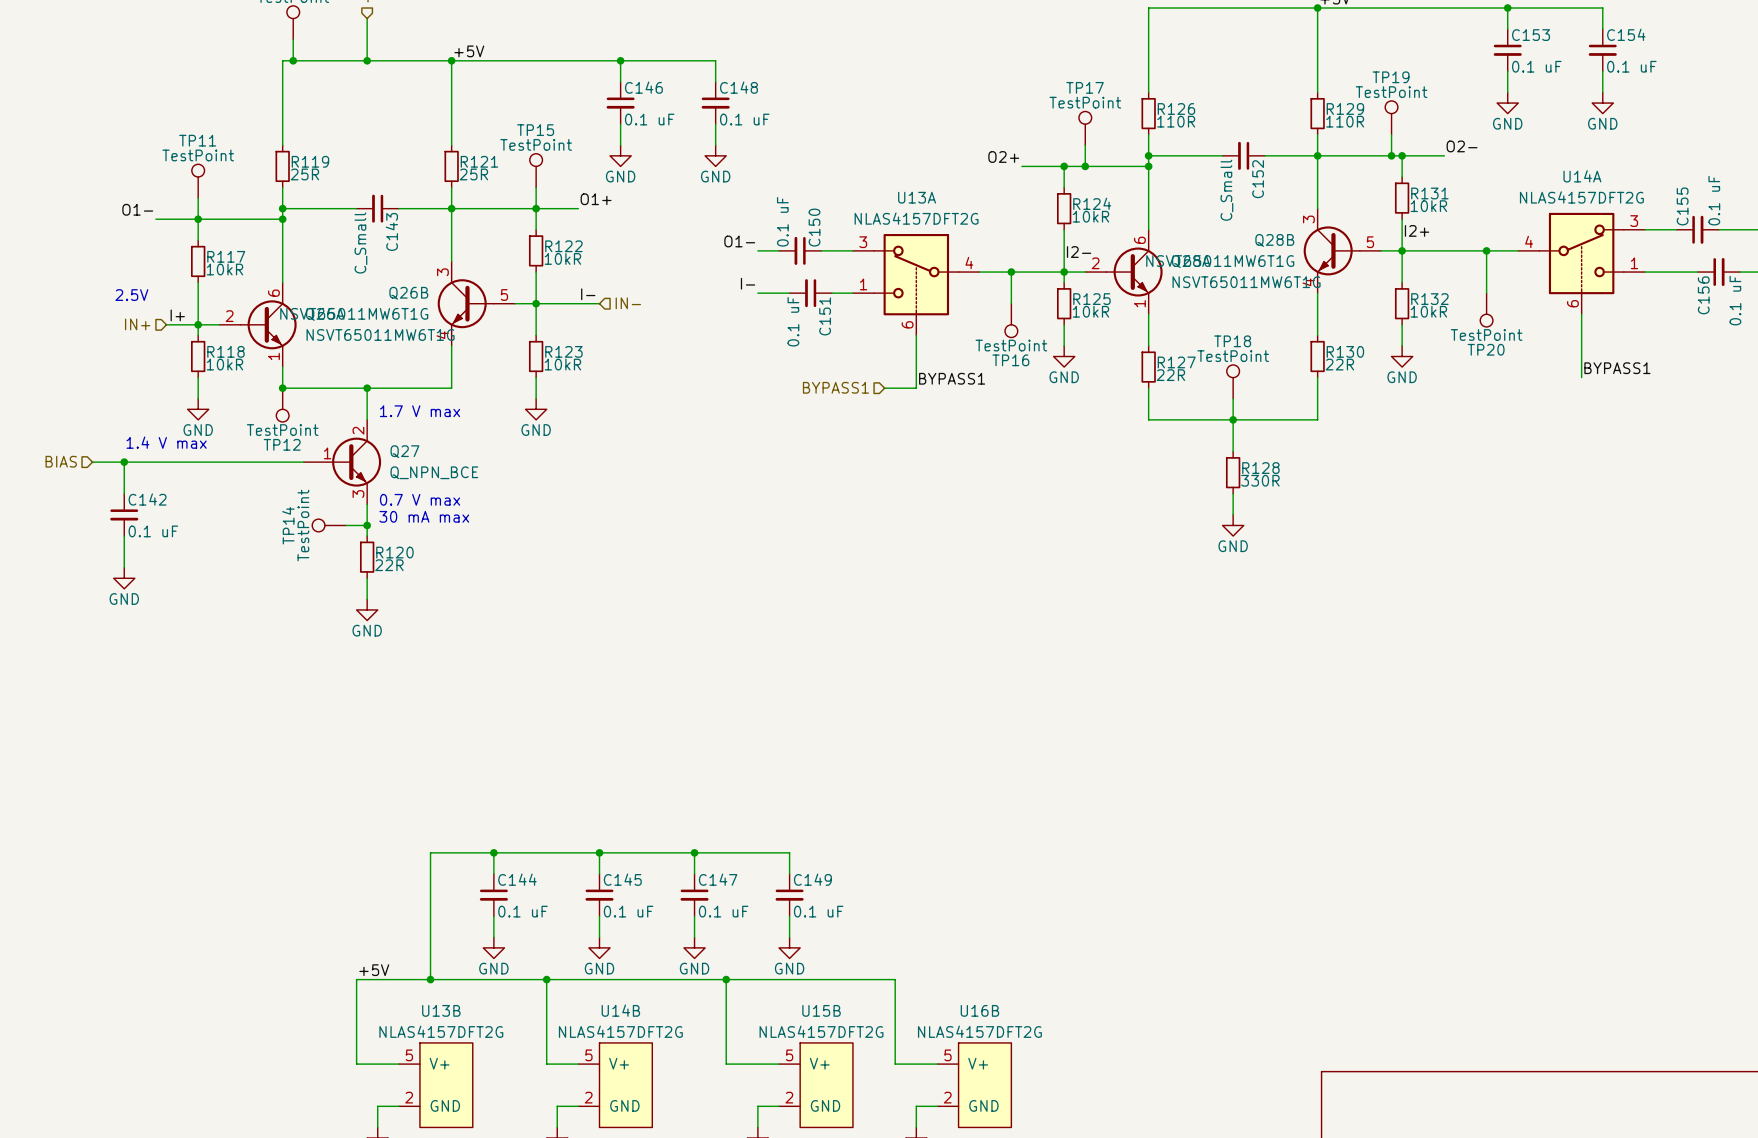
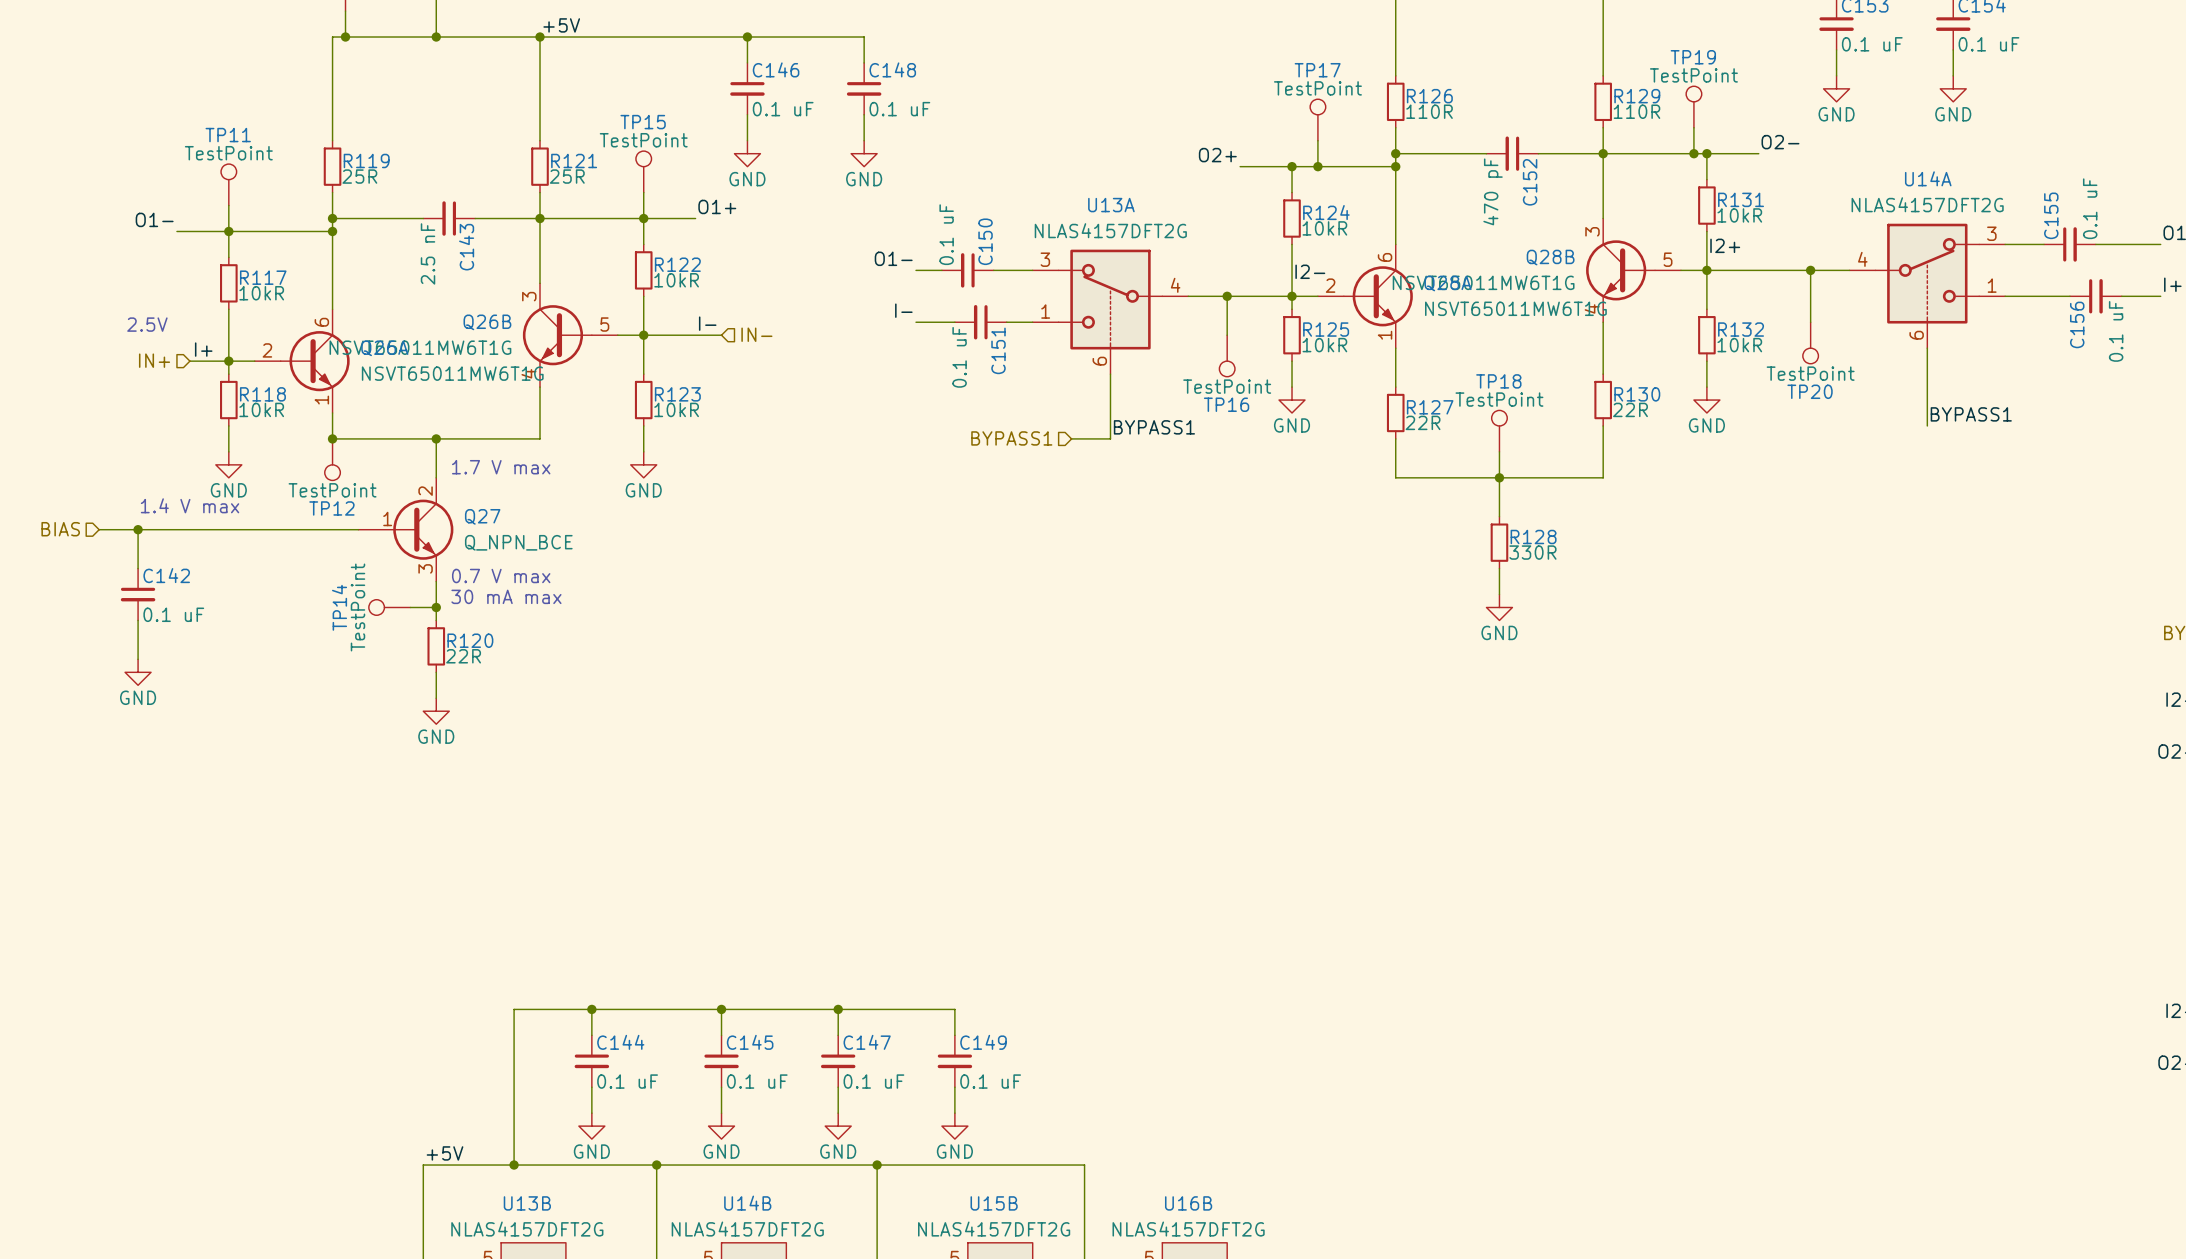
C152 value: C_Small (1226, 190) -> 470 pF (1493, 191)
C143 value: C_Small (360, 243) -> 2.5 nF (428, 253)

